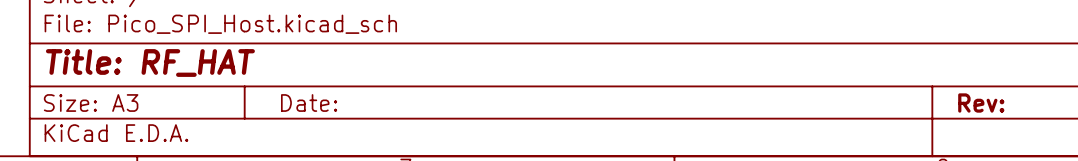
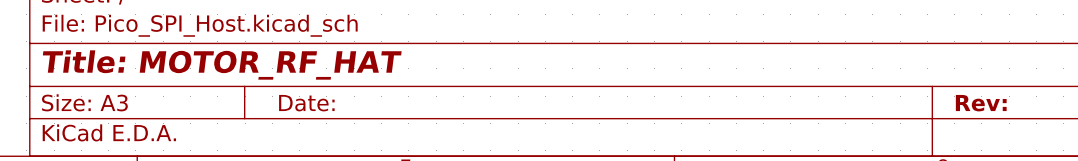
title block: Title: RF_HAT (150, 63) -> Title: MOTOR_RF_HAT (222, 64)

